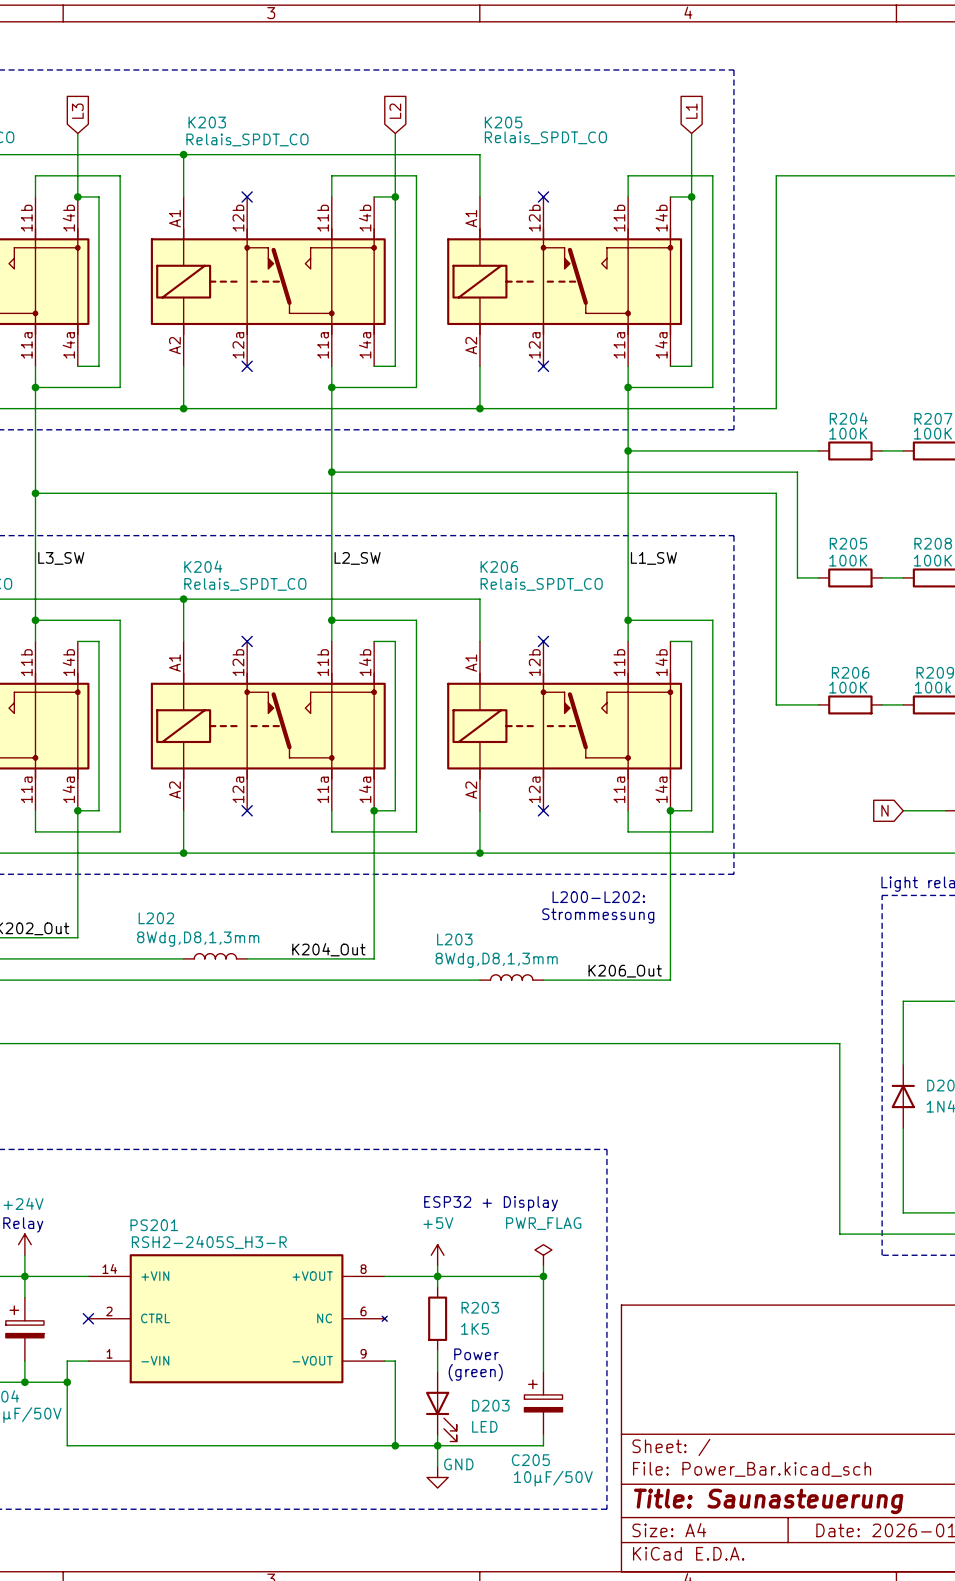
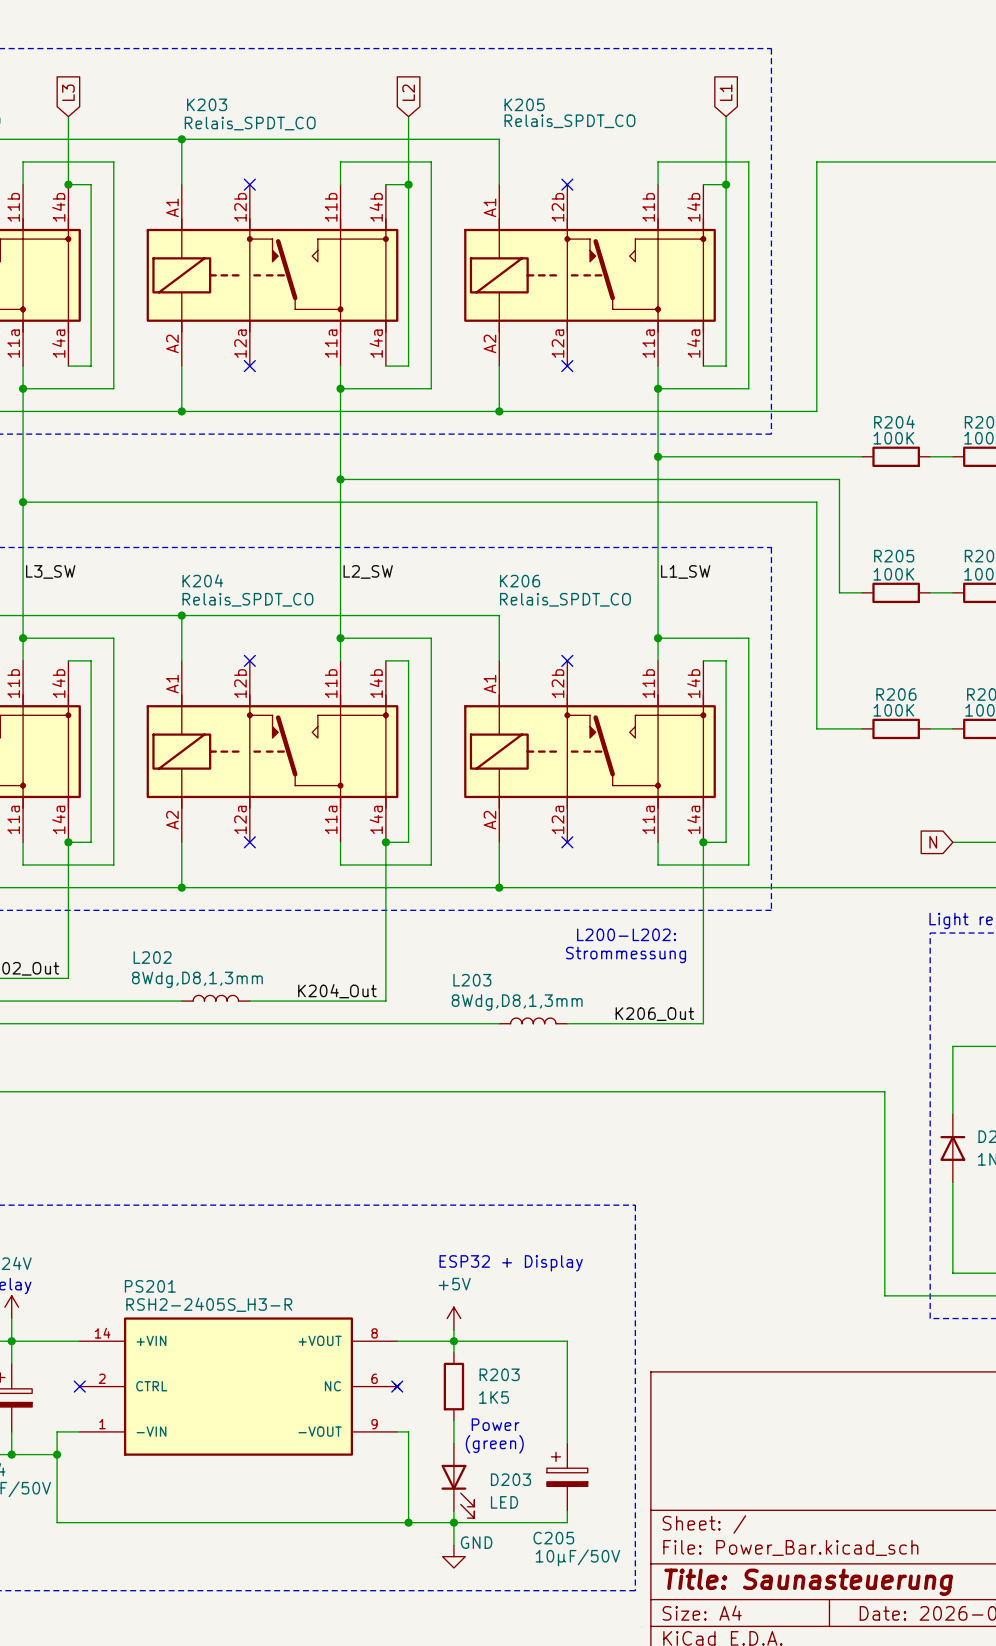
power symbol: PWR_FLAG (543, 1255) -> none
wire: (543, 1265) (543, 1276) -> none
junction: (543, 1276) -> none
no-connect mark: none -> (397, 1386)

